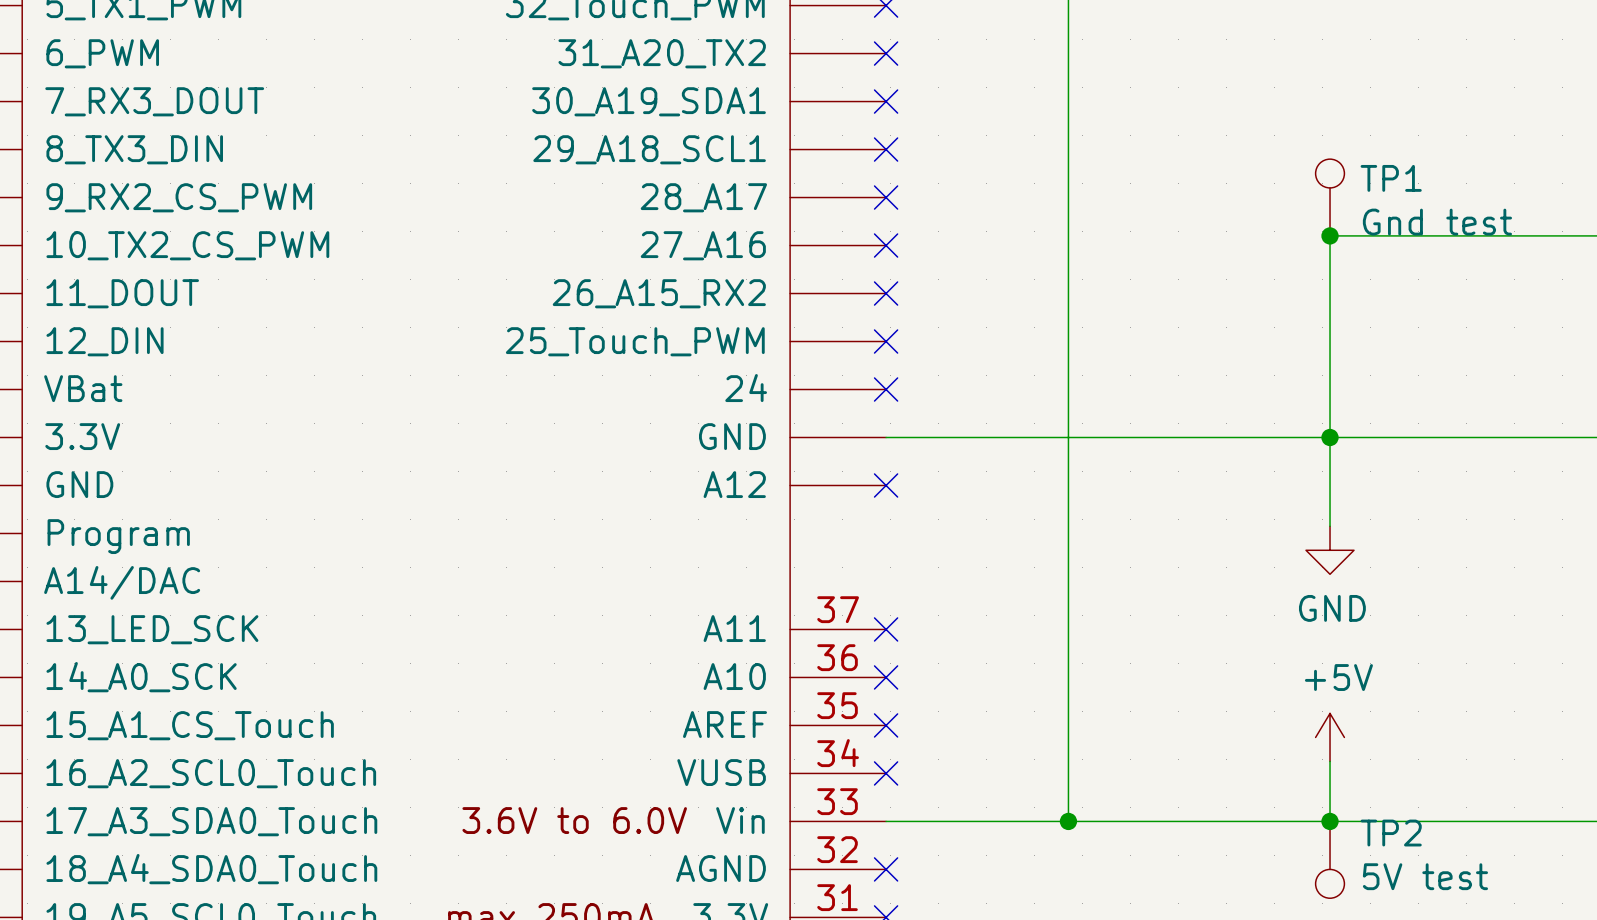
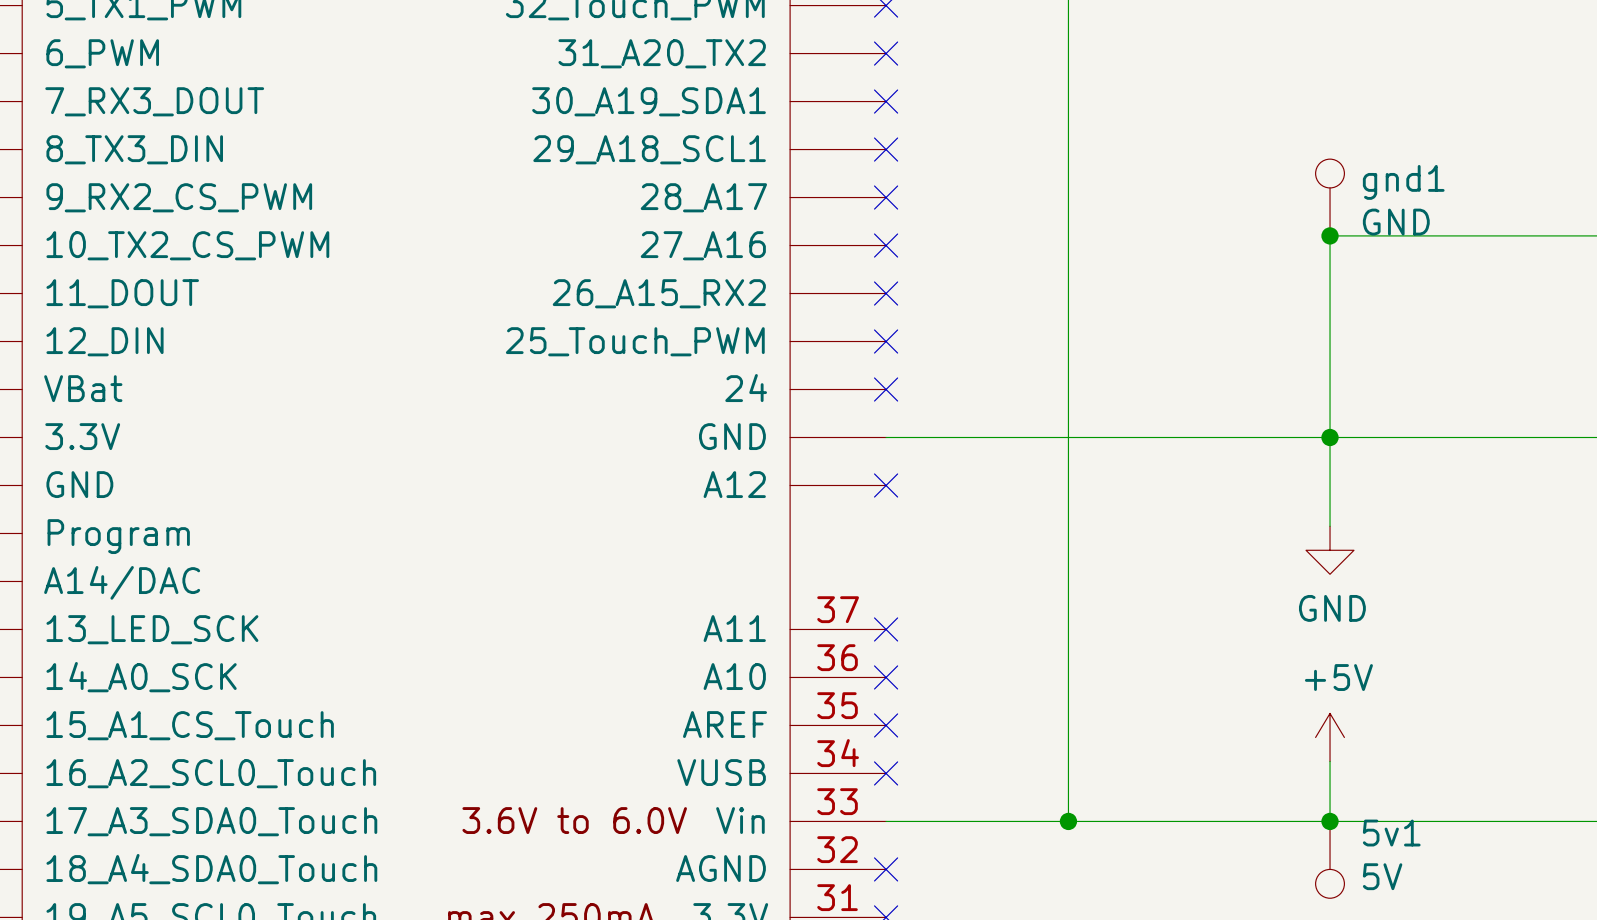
TP1 name: TP1 (1391, 178) -> gnd1 (1403, 182)
TP1 value: Gnd test (1437, 222) -> GND (1396, 222)
TP2 name: TP2 (1391, 833) -> 5v1 (1391, 833)
TP2 value: 5V test (1425, 876) -> 5V (1382, 876)

